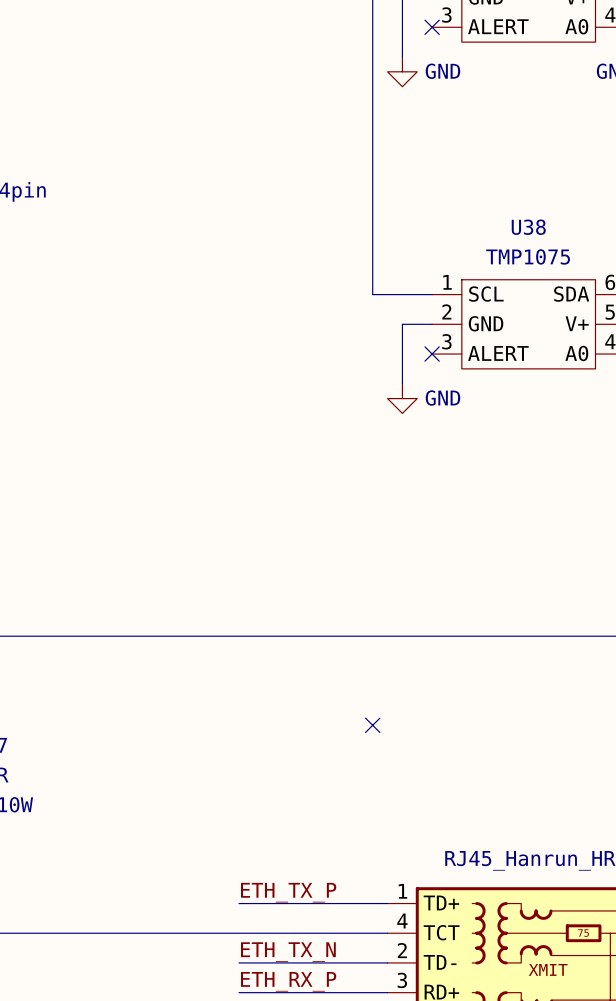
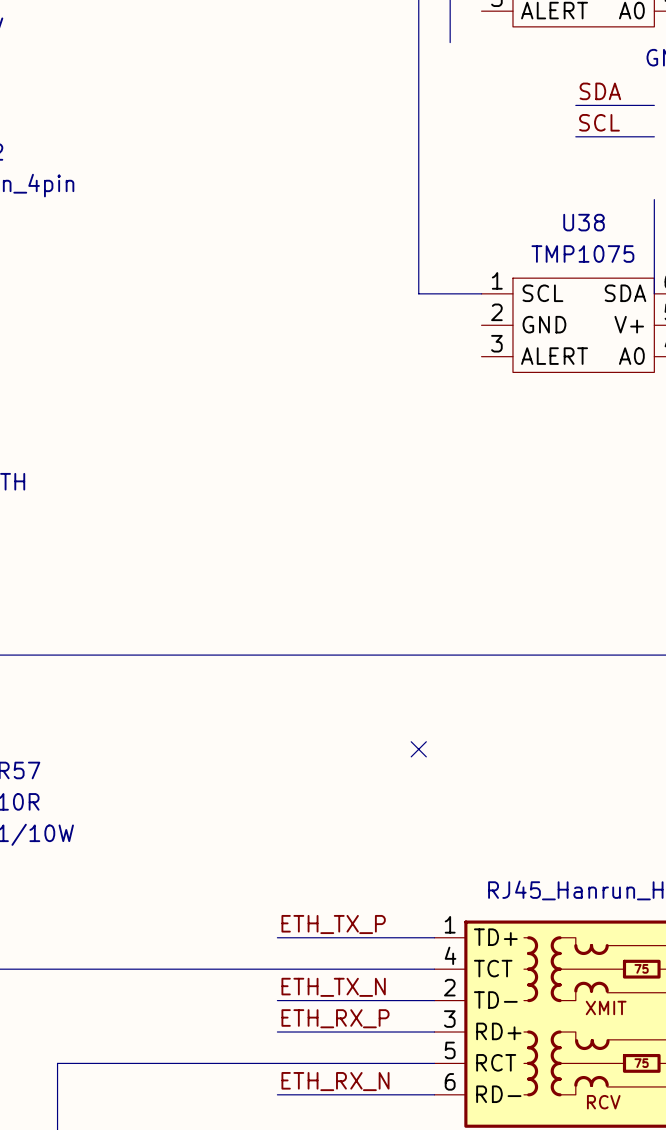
no-connect mark: (432, 27) -> none
power symbol: GND (402, 71) -> none
label: none -> SDA (600, 91)
wire: none -> (575, 105) (654, 105)
label: none -> SCL (599, 122)
wire: none -> (575, 136) (654, 136)
wire: none -> (654, 199) (654, 293)
wire: (432, 324) (402, 324) (402, 383) -> none
no-connect mark: (432, 354) -> none
power symbol: GND (402, 398) -> none

